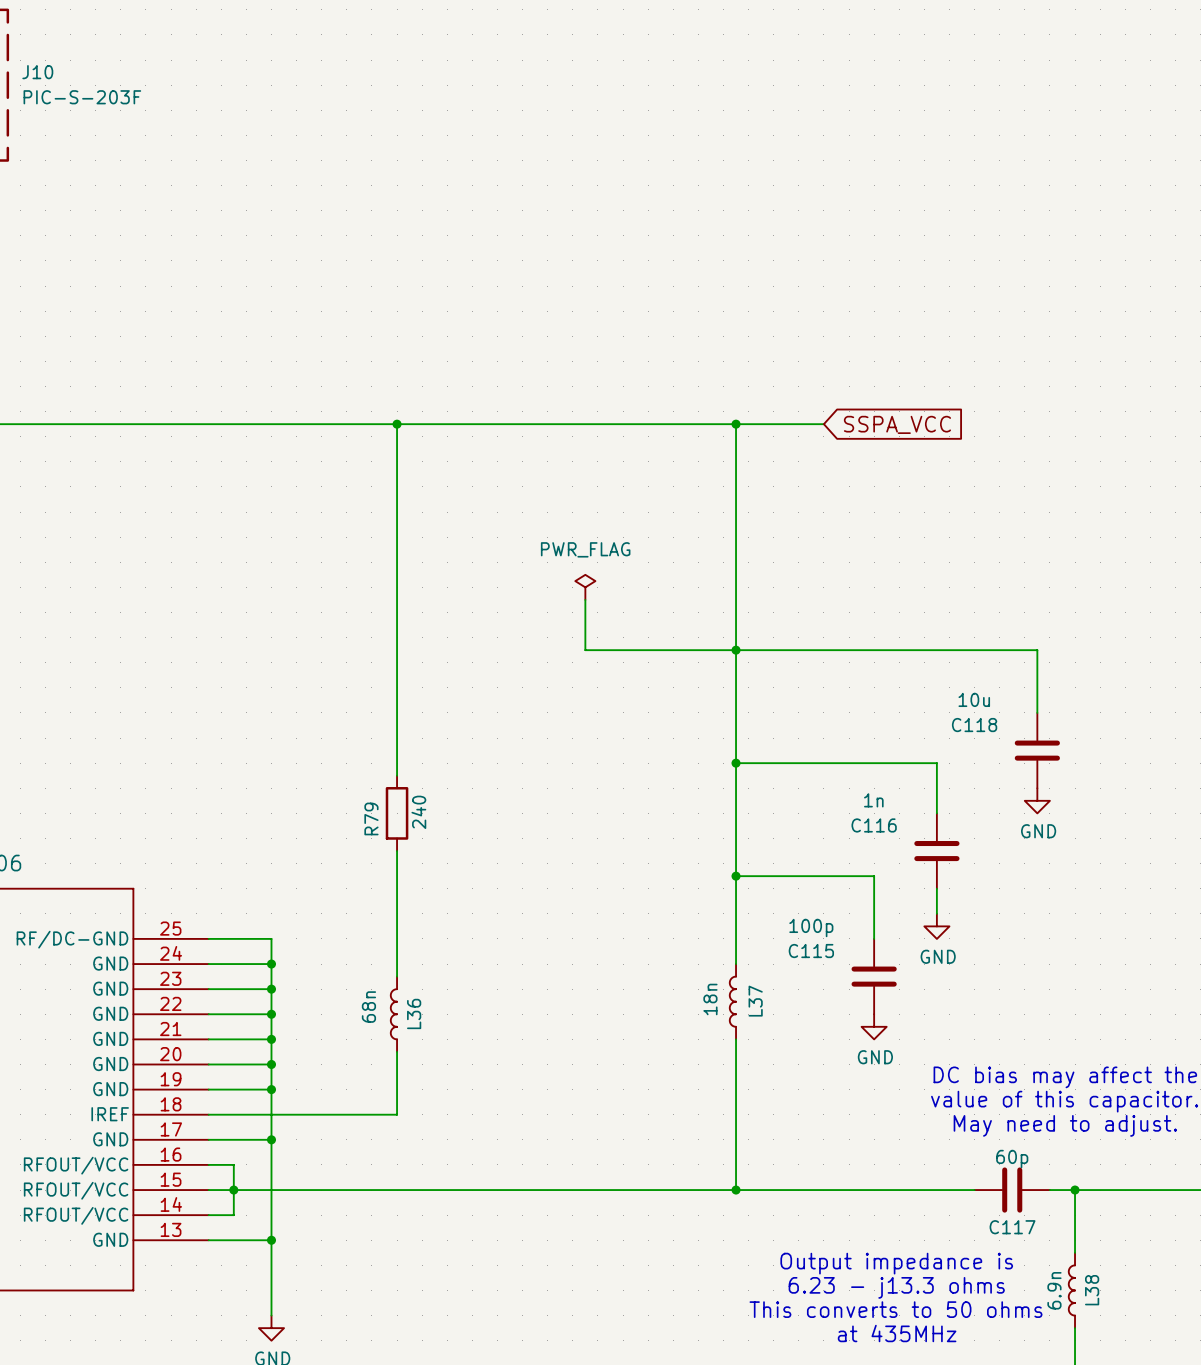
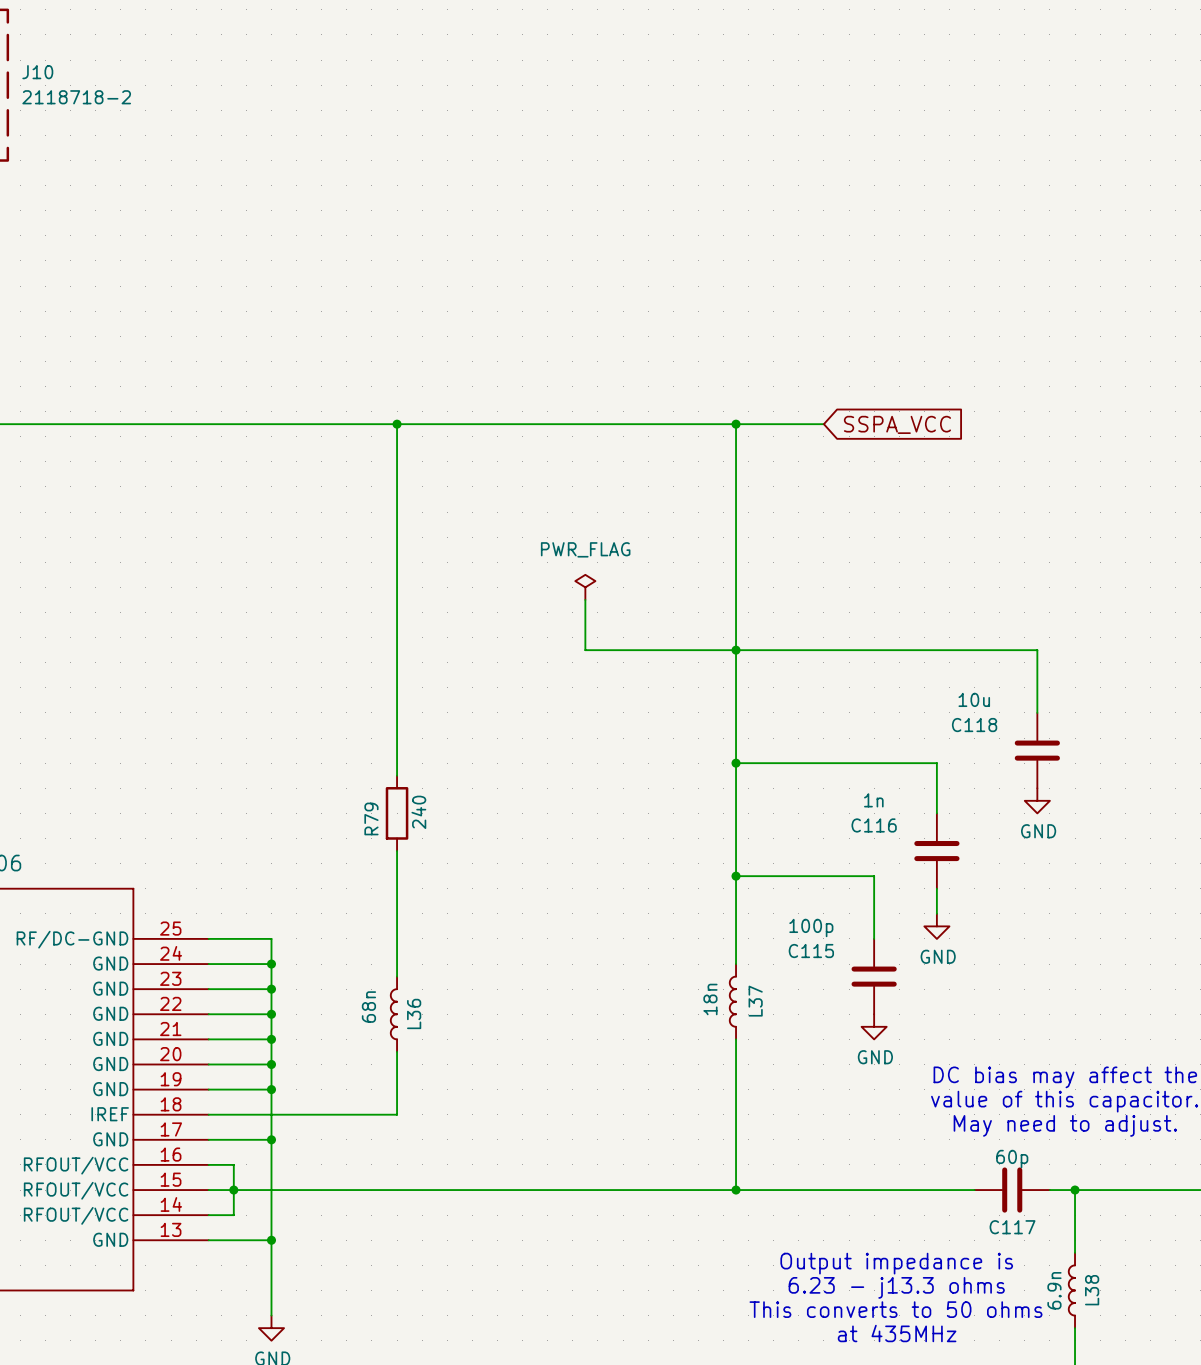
J10 value: PIC-S-203F (82, 97) -> 2118718-2 (76, 97)

